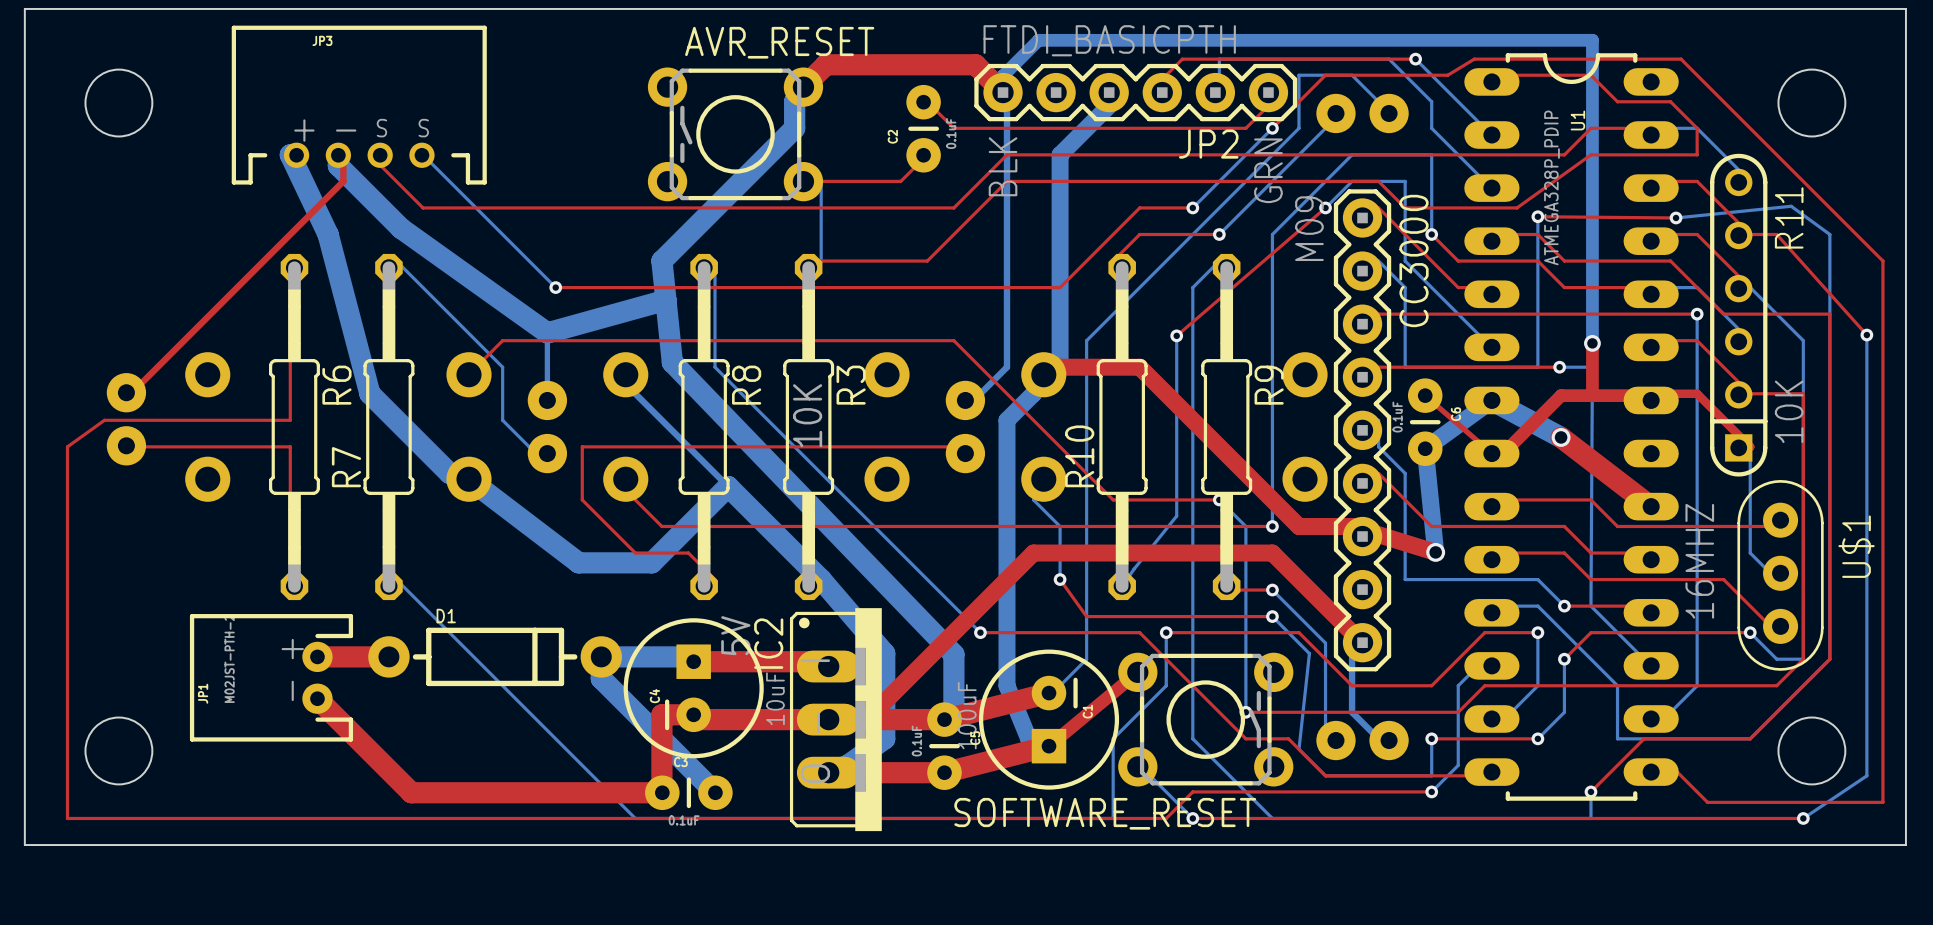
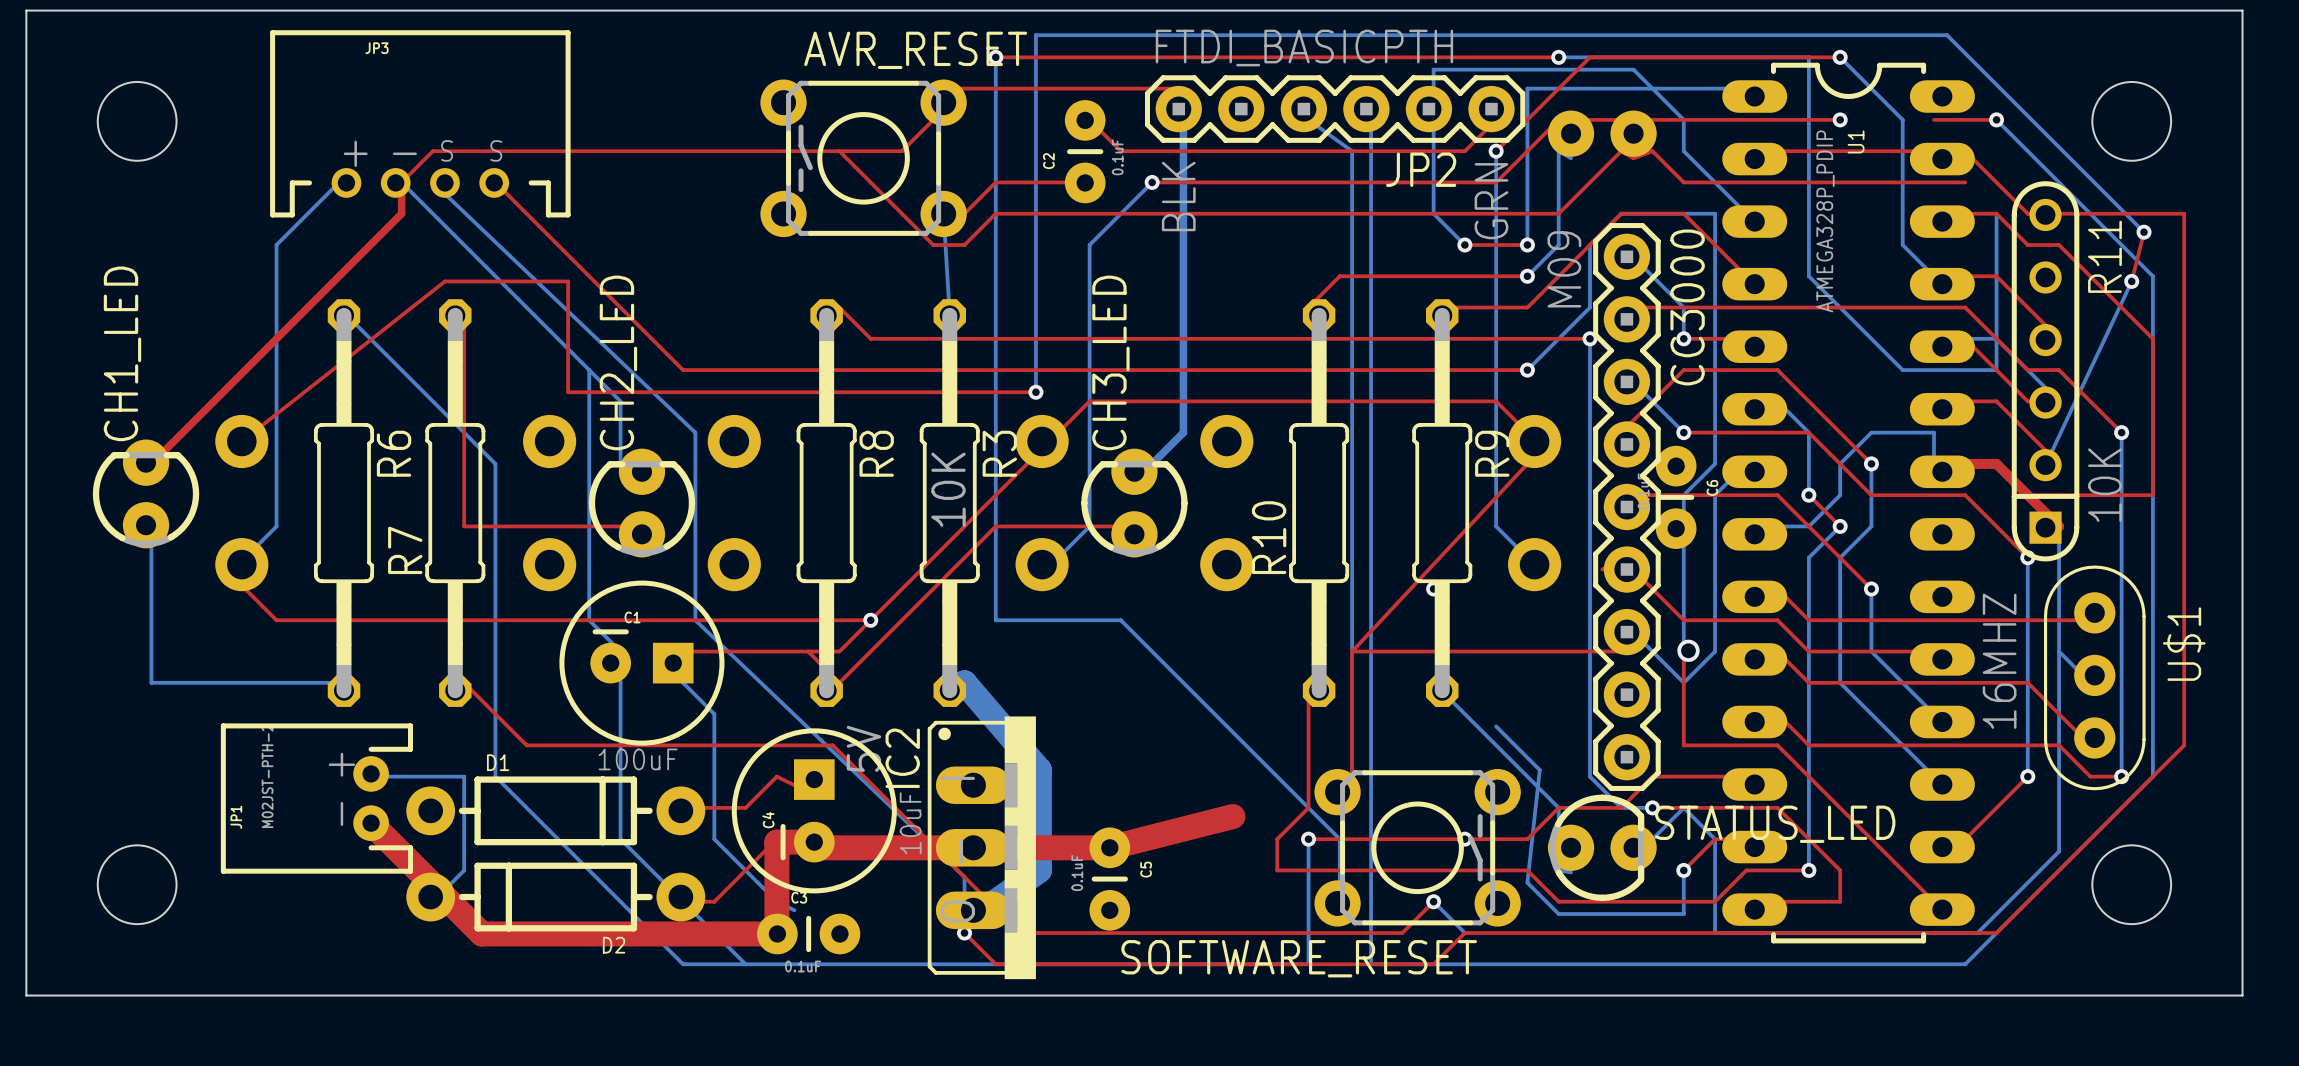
top track: none -> (995, 57) (1558, 57)
via: none -> (995, 57)
bottom track: none -> (1558, 57) (1808, 57) (1808, 255)
via: none -> (1558, 57)
bottom track: none -> (1840, 57) (1902, 119) (1902, 244) (1942, 284)
via: none -> (1840, 57)
bottom track: (1415, 59) (1491, 135) -> none
top track: (1415, 59) (1182, 59) (1166, 75) (1162, 92) -> none
via: (1415, 59) -> none
top track: (1325, 75) (1447, 75) (1474, 59) (1681, 59) (1882, 261) (1882, 802) (1707, 802) (1670, 765) (1651, 772) -> (1558, 88) (1589, 57) (1840, 57)
bottom track: (1352, 75) (1389, 113) -> (1589, 88) (1746, 88) (1754, 96)
top track: (1491, 81) (1511, 75) (1590, 75) (1617, 101) (1644, 101) -> none
bottom track: (803, 87) (794, 101) (794, 128) (661, 261) (672, 362) (953, 654) (953, 712) (944, 719) -> none
top track: (803, 87) (825, 64) (975, 64) (1003, 92) -> (401, 182) (432, 151) (901, 151) (933, 119) (943, 102) (933, 88) (1183, 88) (1178, 109)
bottom track: (1003, 92) (1003, 75) (1038, 40) (1592, 40) (1592, 343) -> none
bottom track: none -> (1366, 109) (1371, 119) (1371, 745)
bottom track: none -> (1428, 109) (1433, 119) (1433, 213) (1464, 244)
bottom track: (1113, 101) (1060, 154) (1060, 367) (1043, 374) (1033, 393) (1006, 420) (1006, 685) (1028, 738) (1049, 746) -> (1308, 119) (1352, 151) (1352, 788) (1337, 792)
top track: none -> (1840, 119) (1558, 119) (1496, 182)
via: none -> (1840, 119)
top track: (1670, 101) (1697, 128) (1697, 154) (1670, 154) -> (1965, 119) (1996, 119)
via: none -> (1996, 119)
bottom track: (1335, 113) (1325, 128) (1219, 234) -> none
bottom track: (1272, 128) (1192, 207) -> (1496, 151) (1496, 276)
bottom track: (1298, 128) (1086, 340) (1086, 659) (1060, 685) (1049, 693) -> (1527, 151) (1527, 244)
top track: (1590, 128) (1564, 154) -> (1871, 182) (1840, 182)
top track: none -> (1871, 151) (1777, 151) (1754, 159)
bottom track: none -> (1571, 158) (1558, 151) (1558, 244) (1527, 276)
bottom track: (1651, 135) (1670, 128) (1697, 128) (1750, 181) (1738, 182) -> none
top track: none -> (1942, 159) (1965, 151) (2027, 213) (2184, 213) (2184, 745) (2152, 776)
bottom track: (290, 154) (328, 234) (369, 393) (449, 473) (469, 479) (578, 562) (651, 562) (728, 486) -> (339, 182) (276, 244) (276, 526) (245, 557) (241, 564)
top track: (927, 154) (900, 181) -> (1089, 182) (995, 182) (964, 213)
bottom track: none -> (1152, 182) (1089, 244) (1089, 526) (1058, 557) (1042, 564)
via: none -> (1152, 182)
top track: (1006, 154) (953, 207) (821, 207) -> (1183, 182) (1152, 182)
top track: (1272, 154) (1431, 154) -> (1558, 213) (1621, 151) (1633, 158) (1652, 151) (1683, 182)
top track: (1590, 154) (1516, 207) (1405, 207) (1378, 181) (1325, 181) -> none
bottom track: (338, 155) (338, 165) (401, 228) (547, 332) -> (395, 182) (401, 182) (620, 401) (620, 463) (641, 471)
bottom track: none -> (444, 182) (432, 182) (695, 432) (695, 620) (964, 877) (964, 932)
top track: (380, 155) (369, 154) (423, 207) (794, 207) -> (839, 151) (933, 244)
bottom track: (421, 155) (555, 287) -> none
top track: none -> (494, 182) (683, 370) (1527, 370)
bottom track: (803, 181) (821, 181) (821, 261) (808, 267) -> (943, 213) (949, 315)
top track: (821, 181) (847, 181) -> (964, 244) (995, 213)
top track: (1006, 181) (927, 261) (821, 261) (808, 267) -> (1183, 213) (1058, 213)
bottom track: (1378, 181) (1352, 181) (1325, 207) -> (1621, 213) (1589, 244) (1589, 307) (1527, 370)
bottom track: (1405, 181) (1405, 261) (1491, 347) -> (1652, 213) (1715, 213) (1715, 463) (1683, 495) (1683, 651)
bottom track: none -> (2144, 232) (1947, 35) (1035, 35) (1035, 392)
top track: none -> (2144, 232) (2131, 281)
via: none -> (2144, 232)
top track: (1192, 207) (1139, 207) (1060, 287) -> (1589, 338) (1245, 338)
via: (1192, 207) -> none
top track: none -> (1464, 244) (1527, 244)
via: none -> (1464, 244)
via: none -> (1527, 244)
top track: (1325, 207) (1176, 335) -> none
via: (1325, 207) -> none
top track: (1723, 207) (1750, 234) -> (2027, 244) (2059, 244) (2152, 338) (2152, 370)
top track: (1537, 216) (1676, 217) -> none
via: (1537, 216) -> none
top track: (1362, 217) (1378, 207) (1458, 287) -> (1683, 338) (1715, 338)
bottom track: none -> (1626, 256) (1621, 244) (1683, 307) (1683, 338)
bottom track: (1676, 217) (1791, 206) (1829, 234) -> (1996, 119) (2152, 276)
via: (1676, 217) -> none
top track: none -> (1433, 276) (1527, 276)
via: (1219, 234) -> none
bottom track: (1272, 234) (1352, 154) (1431, 154) (1431, 234) -> none
via: none -> (1527, 276)
top track: (1431, 234) (1458, 261) -> (1626, 319) (1621, 307) (1715, 307)
via: (1431, 234) -> none
bottom track: (1537, 234) (1537, 367) (1405, 367) (1405, 287) (1378, 261) (1362, 271) -> (1808, 276) (1902, 370) (1996, 370) (1996, 213)
top track: (1750, 234) (1776, 234) (1866, 335) -> none
bottom track: none -> (2131, 281) (2045, 465)
via: none -> (2131, 281)
top track: (1491, 241) (1511, 234) (1537, 234) (1564, 261) -> (1808, 307) (1840, 307)
top track: none -> (1754, 284) (1683, 213) (1621, 213) (1527, 307) (1433, 307) (1442, 315)
top track: (1537, 261) (1564, 287) (1644, 287) (1651, 294) -> (2045, 402) (2059, 401) (2027, 401) (1965, 338) (1942, 346)
bottom track: none -> (344, 315) (339, 307) (495, 463) (495, 776) (683, 964) (745, 964)
top track: (294, 267) (290, 261) (290, 420) (104, 420) (67, 446) (67, 818) (847, 818) -> (964, 932) (995, 964)
bottom track: (388, 267) (396, 261) (502, 367) -> (589, 370) (589, 432)
top track: none -> (455, 315) (464, 307) (464, 526) (620, 526) (641, 534)
bottom track: (704, 267) (715, 261) (715, 367) (980, 632) -> none
bottom track: (1226, 267) (1219, 261) (1192, 287) (1192, 738) (1219, 765) -> none
top track: (555, 287) (741, 287) -> (826, 315) (839, 307) (870, 338)
via: (555, 287) -> none
bottom track: none -> (1589, 338) (1589, 776) (1621, 807) (1652, 807)
via: none -> (1589, 338)
via: none -> (1683, 338)
bottom track: (1738, 288) (1750, 287) (1803, 340) (1803, 367) -> none
bottom track: (665, 300) (547, 332) -> none
via: none -> (1527, 370)
top track: (1431, 314) (1378, 314) (1362, 324) -> (1683, 370) (1621, 432) (1626, 444)
top track: (1511, 314) (1697, 314) -> (1777, 370) (1871, 463)
bottom track: (1697, 314) (1697, 685) (1670, 712) (1651, 718) -> none
via: (1697, 314) -> none
top track: (1750, 314) (1829, 314) -> (2059, 370) (2121, 432)
bottom track: none -> (1626, 381) (1621, 370) (1683, 432)
bottom track: (547, 332) (547, 400) -> none
top track: none -> (1035, 392) (568, 392) (568, 281) (444, 281) (241, 441)
via: none -> (1035, 392)
bottom track: (1176, 335) (1176, 516) (1122, 586) -> none
via: (1176, 335) -> none
bottom track: (1866, 335) (1866, 775) (1803, 818) -> none
via: (1866, 335) -> none
top track: (927, 340) (502, 340) (469, 374) -> (1089, 401) (1058, 432) (1042, 441) (1027, 463) (839, 651) (808, 651)
top track: (953, 340) (1113, 499) (1219, 499) -> (1120, 401) (1496, 401) (1534, 441) (1527, 463) (1352, 651) (1352, 776) (1337, 792)
top track: (1592, 343) (1592, 395) -> none
via: (1592, 343) -> none
bottom track: none -> (1754, 409) (1777, 401) (1808, 432) (1808, 495)
top track: (1431, 367) (1378, 367) (1362, 377) -> none
via: none -> (1683, 432)
top track: (1537, 367) (1559, 367) -> (1808, 432) (1871, 495) (1965, 495) (2027, 557)
bottom track: (1559, 367) (1590, 367) -> (1754, 534) (1777, 526) (1808, 526) (1840, 495) (1840, 463) (1871, 432)
via: (1559, 367) -> none
bottom track: (1592, 367) (1590, 606) -> (1871, 463) (1871, 526) (1840, 557) (1840, 682) (1871, 714)
bottom track: none -> (1873, 432) (1933, 432) (1933, 463)
via: none -> (2121, 432)
bottom track: (625, 374) (635, 393) (728, 486) -> none
top track: (1043, 374) (1060, 367) (1139, 367) (1298, 526) (1352, 526) -> none
via: none -> (1871, 463)
top track: (1750, 393) (1803, 393) (1803, 659) (1776, 685) (1511, 685) -> (1754, 909) (1777, 901) (1840, 901) (1840, 870) (1777, 807)
top track: (1425, 395) (1491, 453) (1503, 453) (1561, 395) (1642, 395) (1644, 393) (1651, 400) -> none
bottom track: none -> (1754, 471) (1746, 463) (1715, 495) (1715, 651) (1683, 682) (1621, 620) (1626, 632)
CH1_LED side: bottom (126, 419) -> top (146, 493)
bottom track: (502, 420) (529, 446) (547, 453) -> (589, 495) (589, 620) (620, 651)
top track: none -> (1808, 495) (1840, 526)
via: none -> (1808, 495)
top track: (1829, 420) (1829, 659) -> (2152, 495) (2027, 495)
CH2_LED side: bottom (547, 426) -> top (641, 503)
CH3_LED side: bottom (965, 426) -> top (1134, 503)
via size: [1551, 427, 1571, 447] -> [1832, 518, 1848, 534]
bottom track: (1362, 430) (1378, 420) (1378, 446) (1405, 473) (1405, 579) (1537, 579) (1564, 606) -> none
CC3000 position: (1362, 430) -> (1626, 506)
top track: none -> (1626, 506) (1621, 495) (1777, 495) (1871, 588)
bottom track: (1561, 437) (1491, 400) (1425, 448) (1435, 552) -> none
top track: (1561, 437) (1651, 506) -> none
bottom track: none -> (146, 525) (151, 526) (151, 682) (339, 682) (344, 690)
top track: (126, 445) (290, 446) (290, 579) (294, 586) -> none
top track: (847, 446) (582, 446) (582, 499) (635, 553) -> (995, 526) (839, 682)
bottom track: (1272, 446) (1272, 526) -> (1496, 526) (1534, 564)
bottom track: none -> (1840, 526) (1808, 557) (1808, 745)
bottom track: none -> (2027, 557) (2027, 776)
via: none -> (2027, 557)
top track: (625, 479) (635, 499) (661, 526) -> (241, 564) (245, 588) (276, 620) (776, 620)
bottom track: (1043, 479) (1033, 499) (1060, 526) (1060, 579) -> none
bottom track: (728, 486) (821, 579) -> none
bottom track: (1219, 499) (1245, 526) (1245, 712) -> none
top track: (1511, 499) (1590, 499) (1617, 526) -> (1840, 620) (1902, 620)
top track: none -> (1777, 588) (1808, 620)
bottom track: none -> (1871, 588) (1871, 651) (1942, 721)
via: none -> (1871, 588)
top track: (741, 526) (1272, 526) -> none
via: none -> (870, 620)
via: (1272, 526) -> none
top track: (1352, 526) (1435, 552) -> none
top track: (1511, 526) (1537, 526) -> (1777, 620) (1808, 651)
top track: (1564, 526) (1590, 553) -> (1840, 651) (1871, 651)
top track: none -> (745, 651) (683, 651) (673, 663)
top track: (1150, 553) (1033, 553) (874, 712) (874, 719) -> none
top track width: thick (1150, 553) (1272, 553) -> thin (1352, 651) (1496, 651)
top track: (1272, 553) (1362, 642) -> (1496, 651) (1621, 651) (1626, 632)
top track: none -> (1683, 651) (1683, 745) (1746, 745)
top track: (1511, 553) (1537, 553) -> (1371, 964) (1402, 964)
top track: (1564, 553) (1590, 579) -> (1777, 651) (1808, 682) (1871, 682)
bottom track: none -> (673, 663) (683, 682) (714, 714) (714, 839) (776, 901) (794, 910)
top track: (1060, 579) (1086, 616) (1272, 616) -> none
via: (1060, 579) -> none
bottom track: (388, 586) (396, 579) (529, 712) -> (620, 651) (620, 839)
top track: none -> (455, 690) (464, 682) (526, 745) (832, 745) (1020, 932) (1402, 932) (1433, 901)
top track: (1226, 586) (1229, 590) (1272, 590) -> none
bottom track: (1272, 590) (1325, 643) (1325, 685) -> (1442, 690) (1433, 682) (1558, 807)
via: (1272, 590) -> none
top track: (1564, 606) (1644, 606) (1651, 612) -> none
via: (1564, 606) -> none
bottom track: (1491, 612) (1511, 606) (1537, 606) (1617, 685) (1617, 738) (1750, 738) -> none
via: (1272, 616) -> none
top track: (980, 632) (1139, 632) (1245, 738) -> (1319, 690) (1308, 682) (1308, 807) (1277, 839) (1277, 870) (1464, 870)
via: (980, 632) -> none
top track: (1166, 632) (1298, 632) (1352, 685) -> none
via: (1166, 632) -> none
top track: (1484, 632) (1431, 685) -> (1746, 807) (1683, 807)
top track: (1511, 632) (1537, 632) -> (1777, 745) (1942, 909)
via: (1537, 632) -> none
top track: (1590, 632) (1564, 659) -> (1871, 745) (1808, 745) (1777, 714) (1754, 721)
bottom track: (1750, 632) (1776, 659) (1803, 659) -> none
top track: none -> (2059, 745) (2090, 776) (2121, 776)
via: (1750, 632) -> none
bottom track: (1362, 642) (1352, 659) (1352, 712) (1378, 738) (1389, 740) -> none
bottom track: none -> (371, 773) (370, 776) (464, 776) (464, 870) (432, 901) (430, 897)
top track: (317, 656) (388, 656) -> none
D1 position: (495, 656) -> (555, 810)
bottom track: (688, 659) (693, 661) (688, 656) (601, 656) (601, 678) (715, 792) -> none
bottom track: (1564, 659) (1564, 712) (1537, 738) -> (1808, 807) (1808, 870)
via: (1564, 659) -> none
top track: none -> (2027, 776) (1965, 839) (1942, 847)
via: none -> (2027, 776)
via: none -> (2121, 776)
top track: (693, 661) (823, 661) (828, 666) -> none
bottom track: (1491, 665) (1484, 659) (1458, 685) (1458, 712) -> (1633, 847) (1652, 839) (1683, 807) (1715, 839)
top track: none -> (794, 785) (776, 776) (745, 807) (683, 807) (680, 810)
top track: (1137, 672) (1049, 746) (944, 772) (828, 772) -> none
bottom track: (1166, 685) (1113, 738) -> (1308, 839) (1308, 870)
top track: (1378, 685) (1405, 685) -> (1621, 807) (1652, 776) (1746, 776) (1754, 784)
via: none -> (1652, 807)
top track: (1484, 685) (1458, 712) (1298, 712) -> (1589, 807) (1558, 807) (1527, 839)
bottom track: (1537, 685) (1511, 712) (1491, 718) -> none
top track: none -> (1308, 839) (1464, 839)
via: none -> (1308, 839)
top track: none -> (794, 847) (776, 839) (714, 901) (683, 901) (680, 897)
C1 rotation: 0° (1049, 719) -> 90° counterclockwise (641, 663)
C1 position: (1049, 719) -> (641, 663)
top track: (1288, 738) (1325, 775) (1484, 775) (1491, 772) -> (1515, 870) (1527, 870) (1558, 901) (1715, 901) (1746, 870)
top track: (1431, 738) (1484, 738) -> (1683, 870) (1715, 839) (1746, 839) (1754, 847)
top track: (1750, 738) (1644, 738) (1590, 791) -> (2059, 870) (1996, 932) (1683, 932)
STATUS_LED side: bottom (1362, 740) -> top (1602, 847)
D2: none -> (555, 897)
bottom track: (1139, 765) (1192, 818) -> (1339, 901) (1339, 839) (1120, 620) (995, 620) (995, 57)
bottom track: (1458, 765) (1431, 791) -> (1715, 901) (1715, 932) (1977, 932) (2059, 851) (2059, 651)
via: none -> (964, 932)
bottom track: (1245, 791) (1272, 818) -> (1371, 807) (1371, 964) (1496, 964)
top track: (1245, 791) (1192, 791) (1166, 818) -> (1464, 932) (1433, 964)
via: (1431, 791) -> none
bottom track: (1590, 791) (1590, 818) -> (2059, 870) (1965, 964) (1871, 964)
via: (1590, 791) -> none
via position: (1192, 818) -> (1433, 901)
top track: (1219, 818) (1803, 818) -> none
via: (1803, 818) -> none

